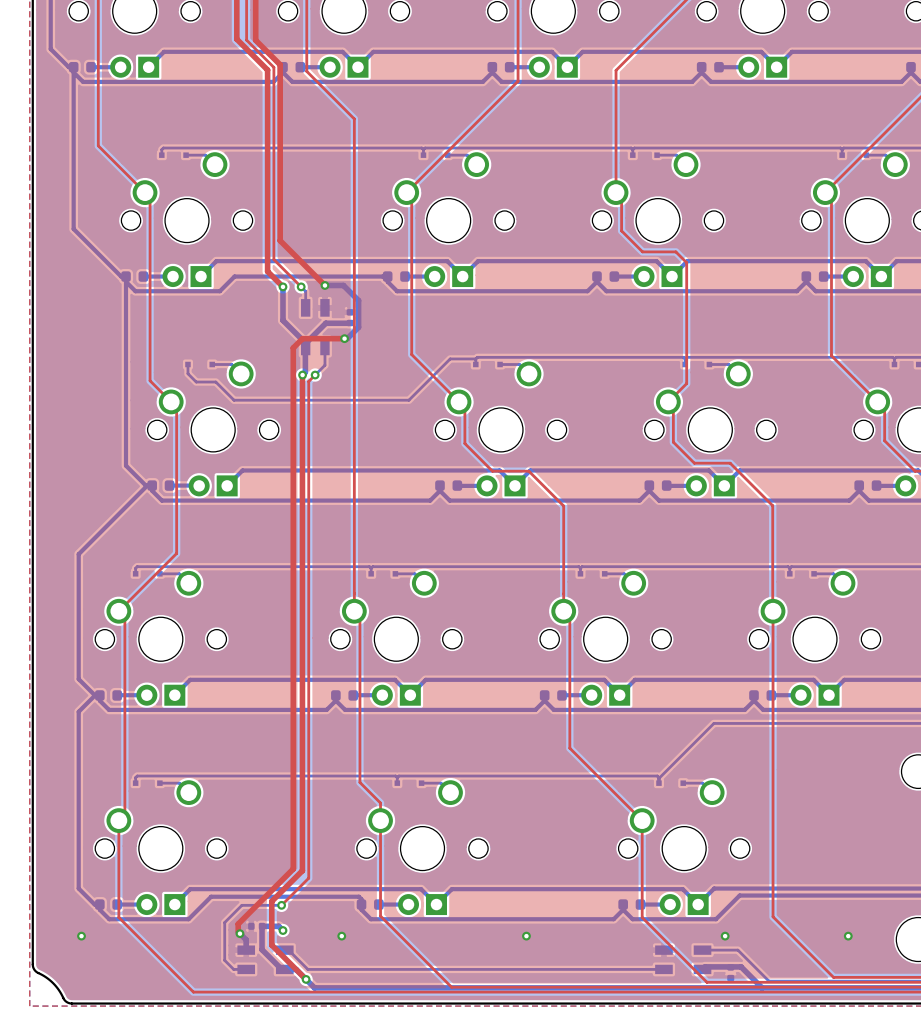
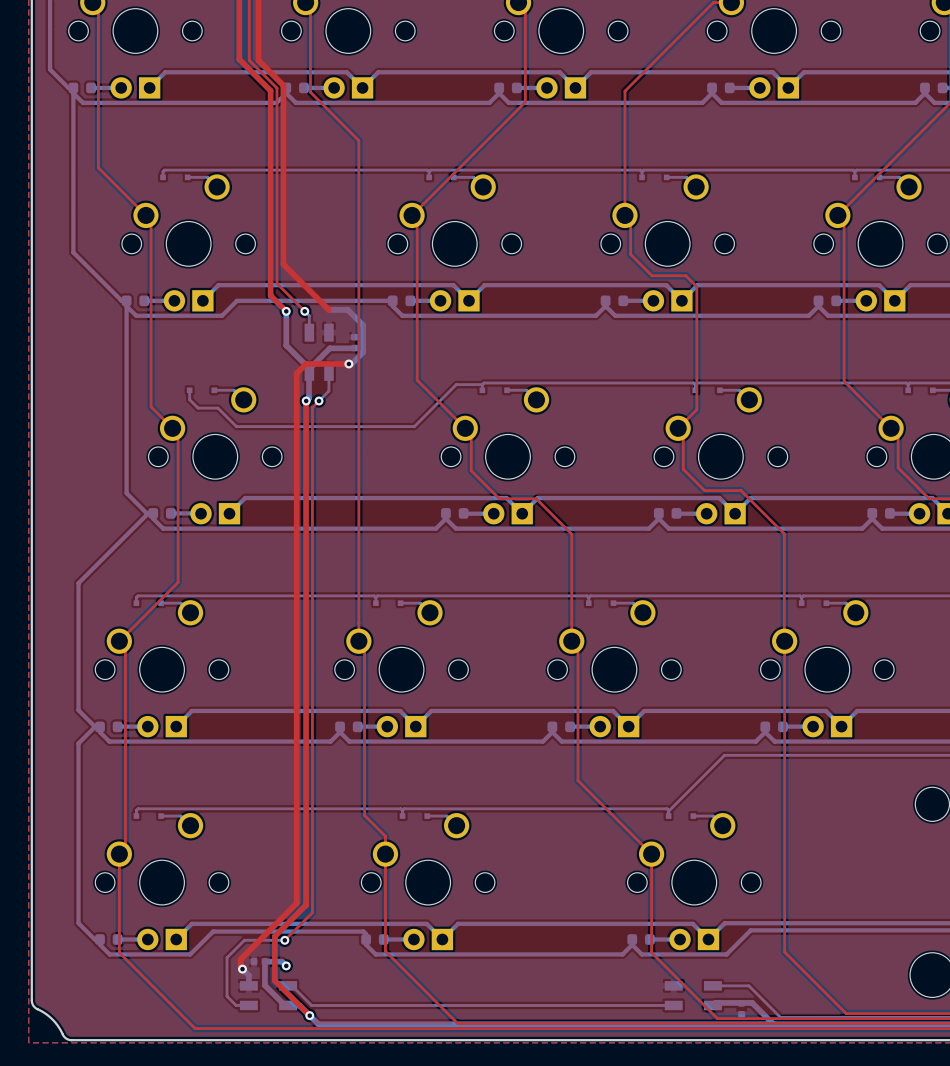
via: (324, 285) -> none
via: (81, 936) -> none
via: (341, 936) -> none
via: (526, 936) -> none
via: (725, 936) -> none
via: (848, 936) -> none

